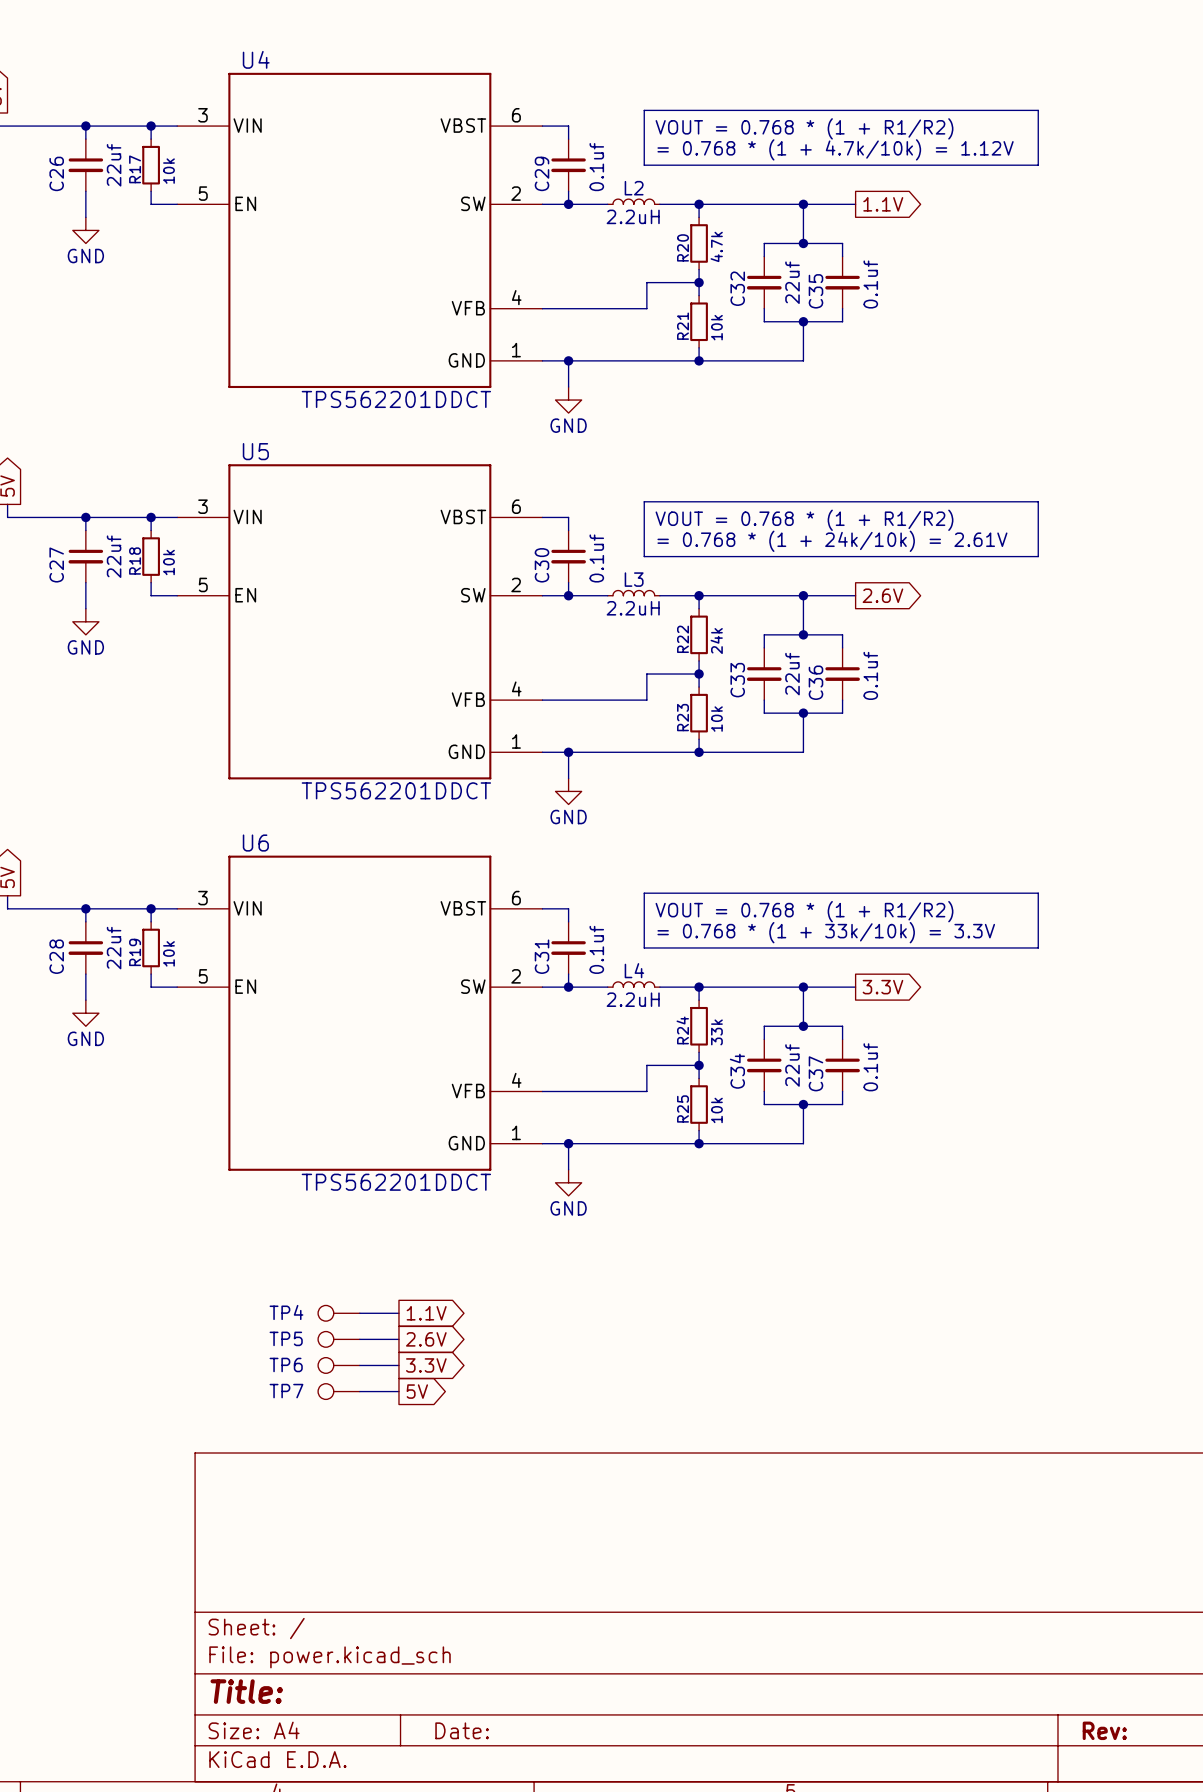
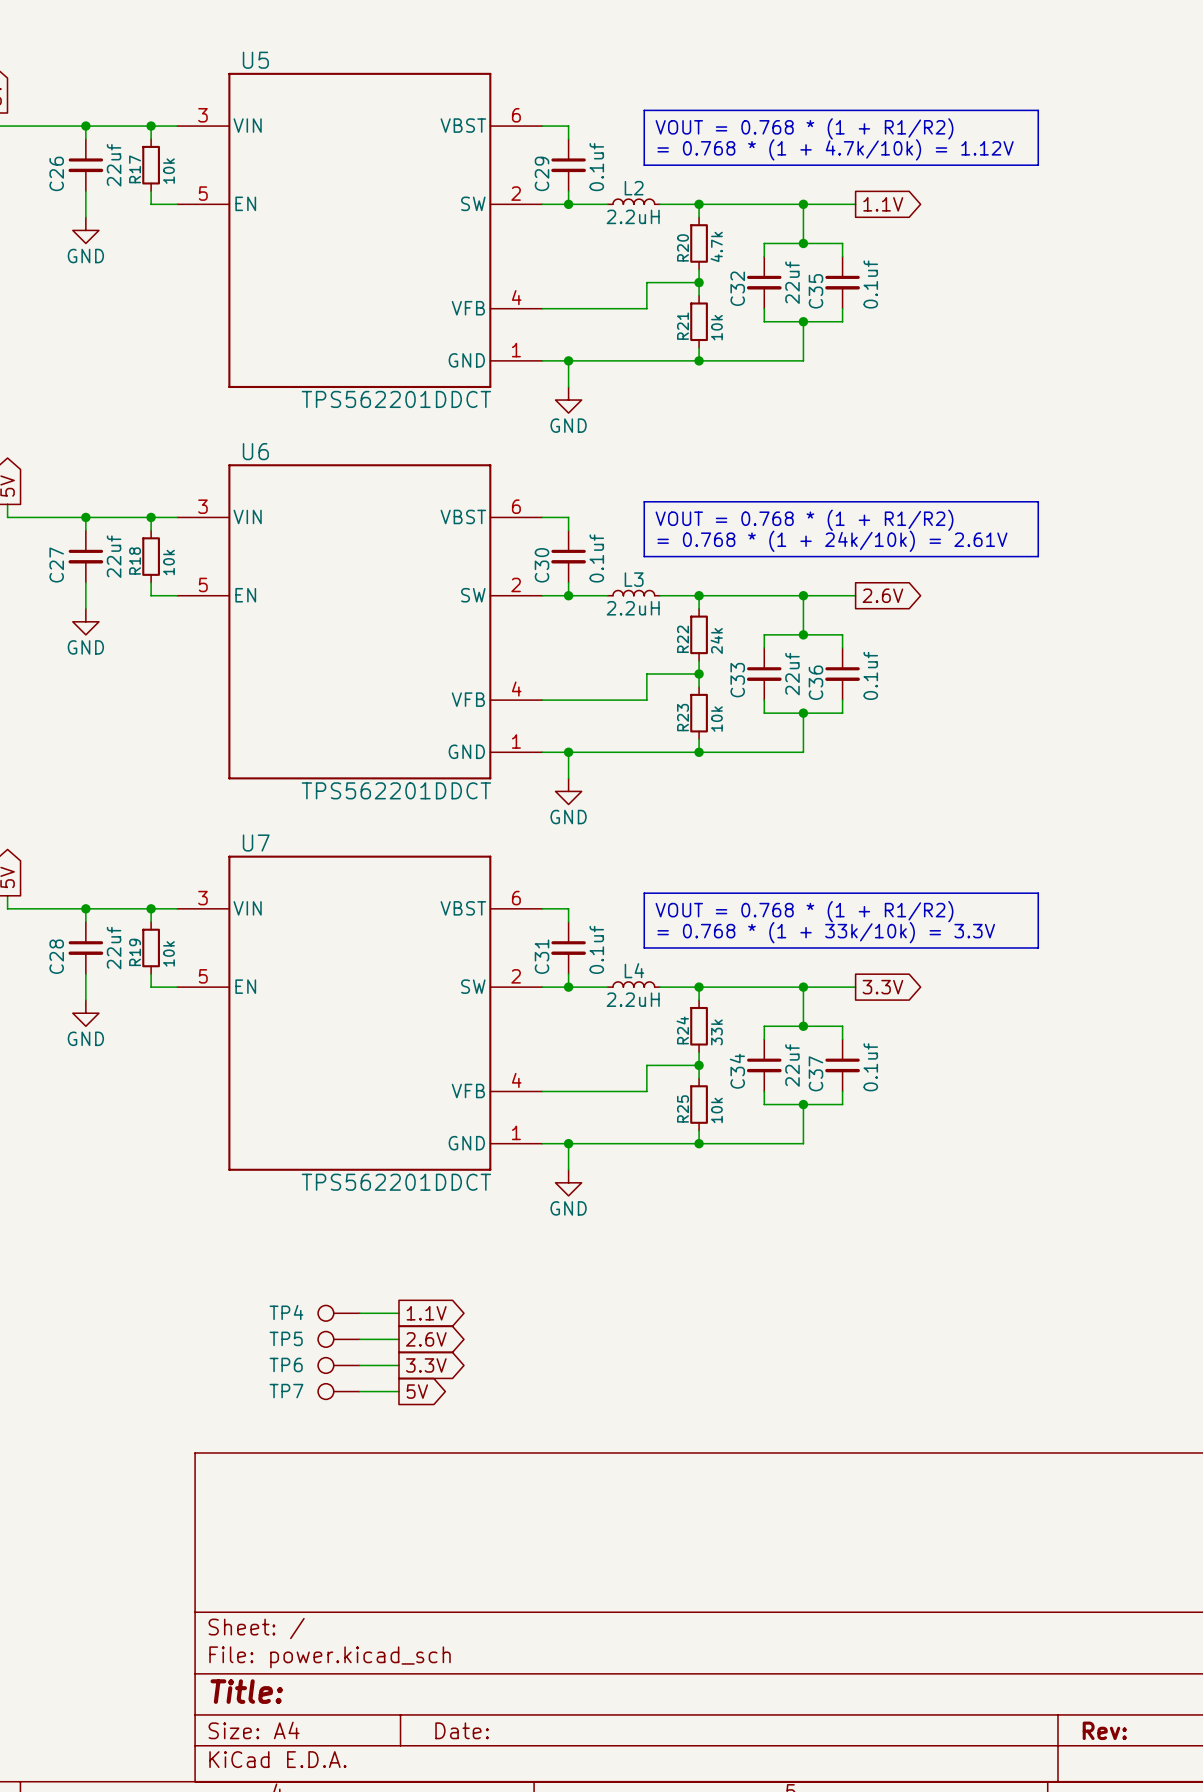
U4 name: U4 (256, 59) -> U5 (255, 60)
U5 name: U5 (255, 451) -> U6 (255, 451)
U6 name: U6 (255, 843) -> U7 (256, 843)

